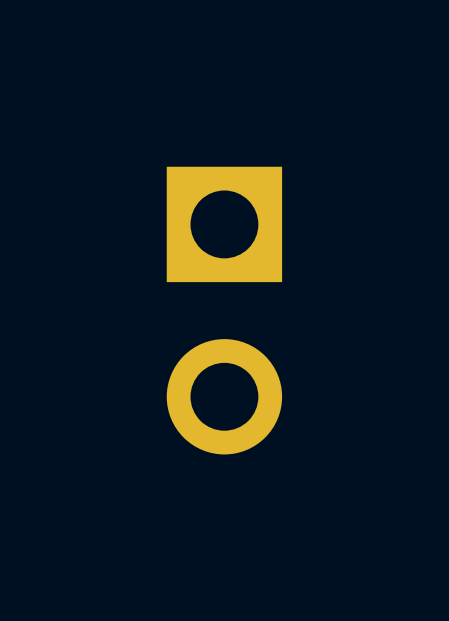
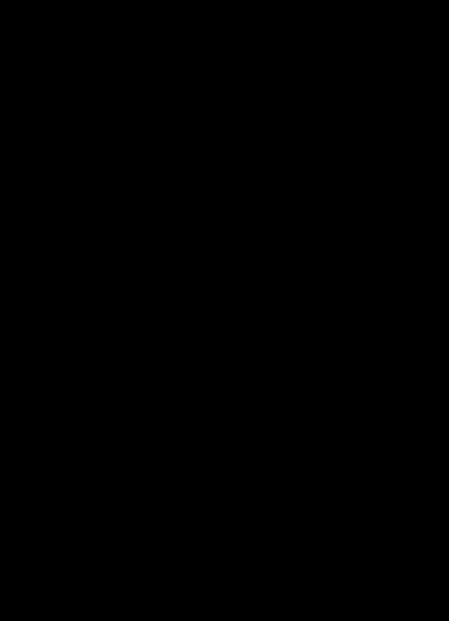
part: (224, 310) -> none

